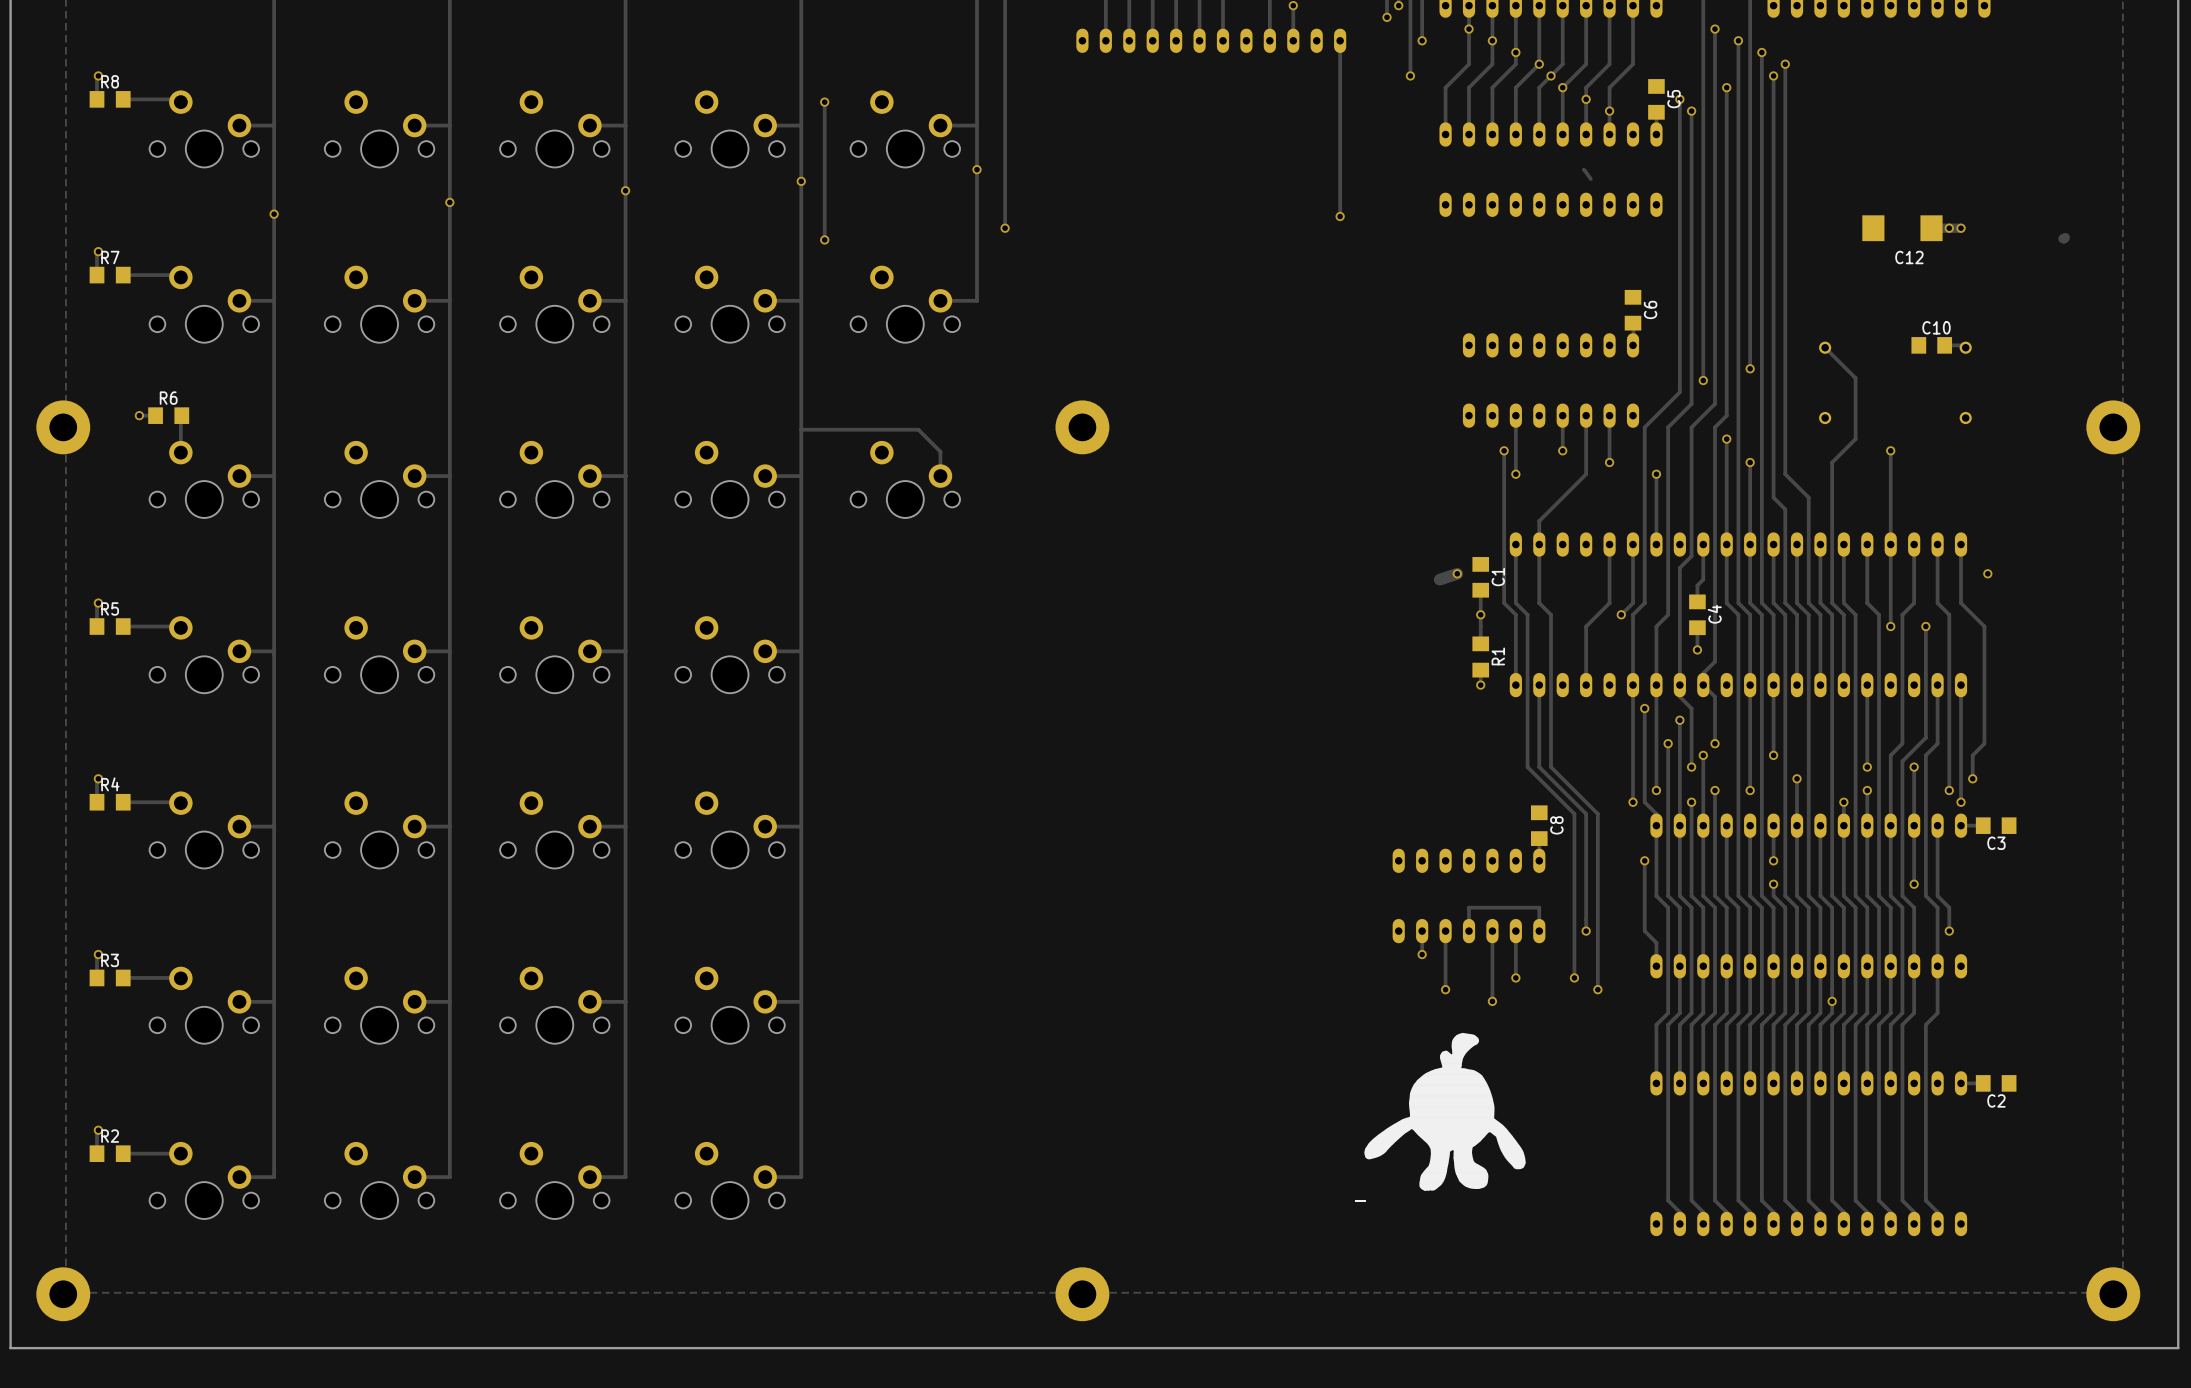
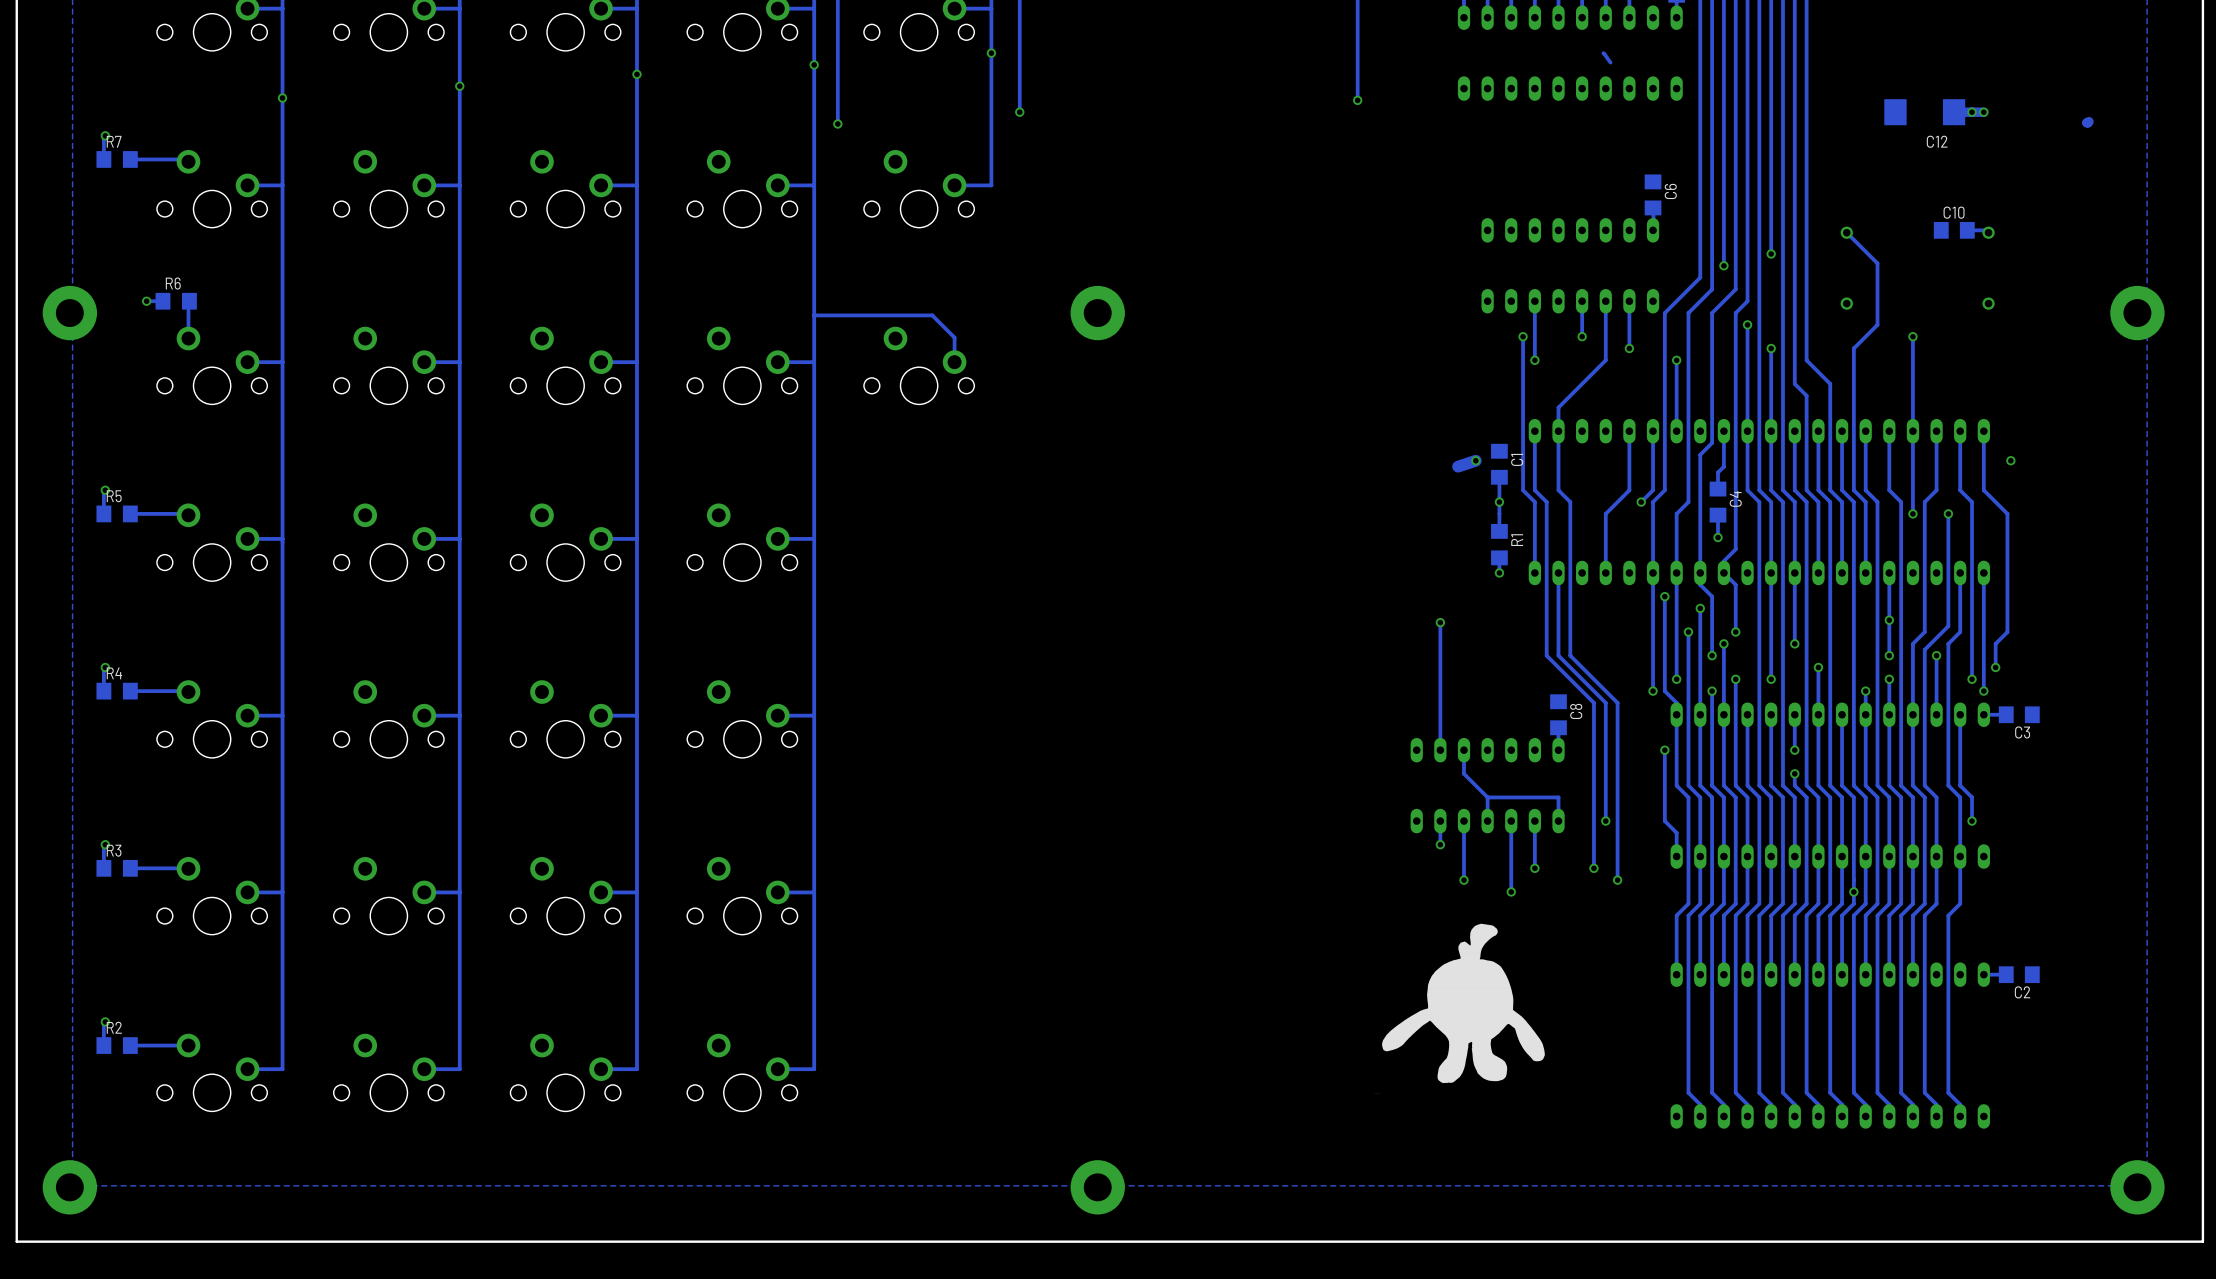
via: none -> (1889, 620)
track: none -> (1440, 622) (1440, 750)
via: none -> (1440, 622)
track: (1914, 825) (1914, 884) -> none
track: none -> (1463, 750) (1463, 773) (1487, 797)
via: (1914, 884) -> none

